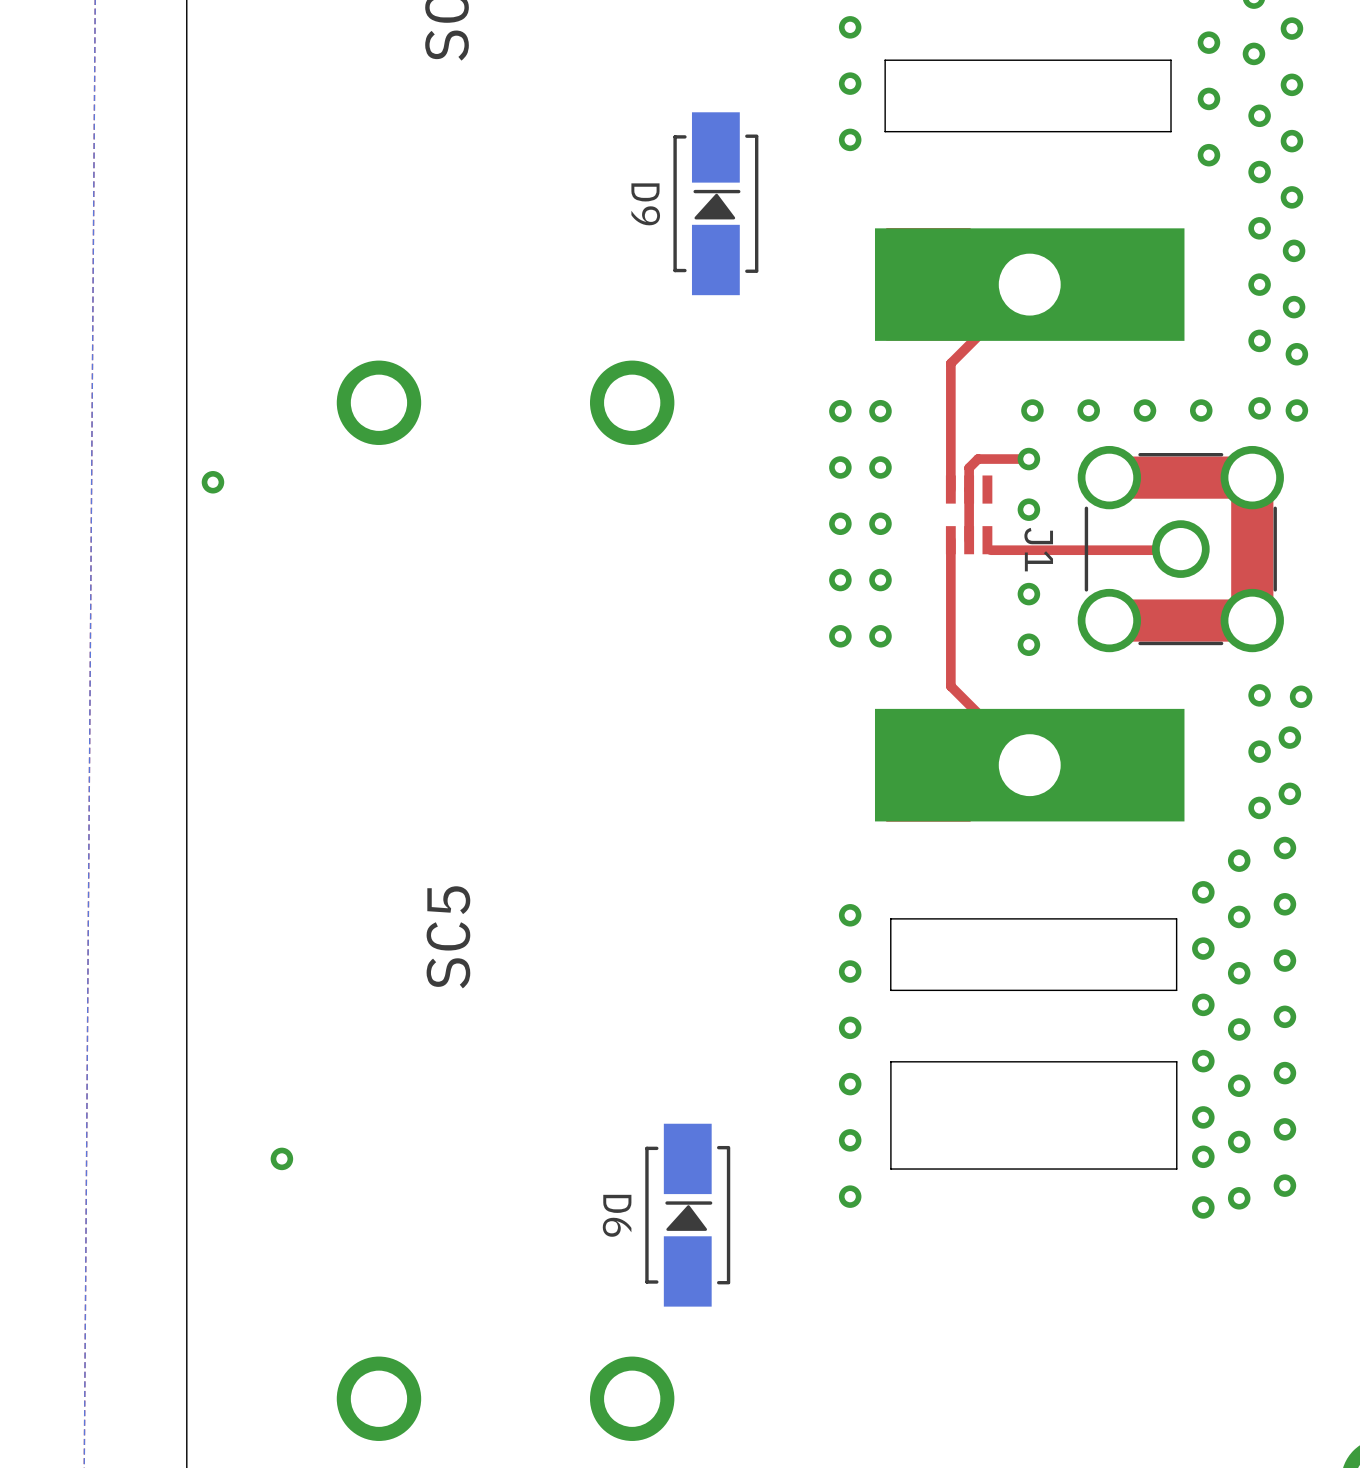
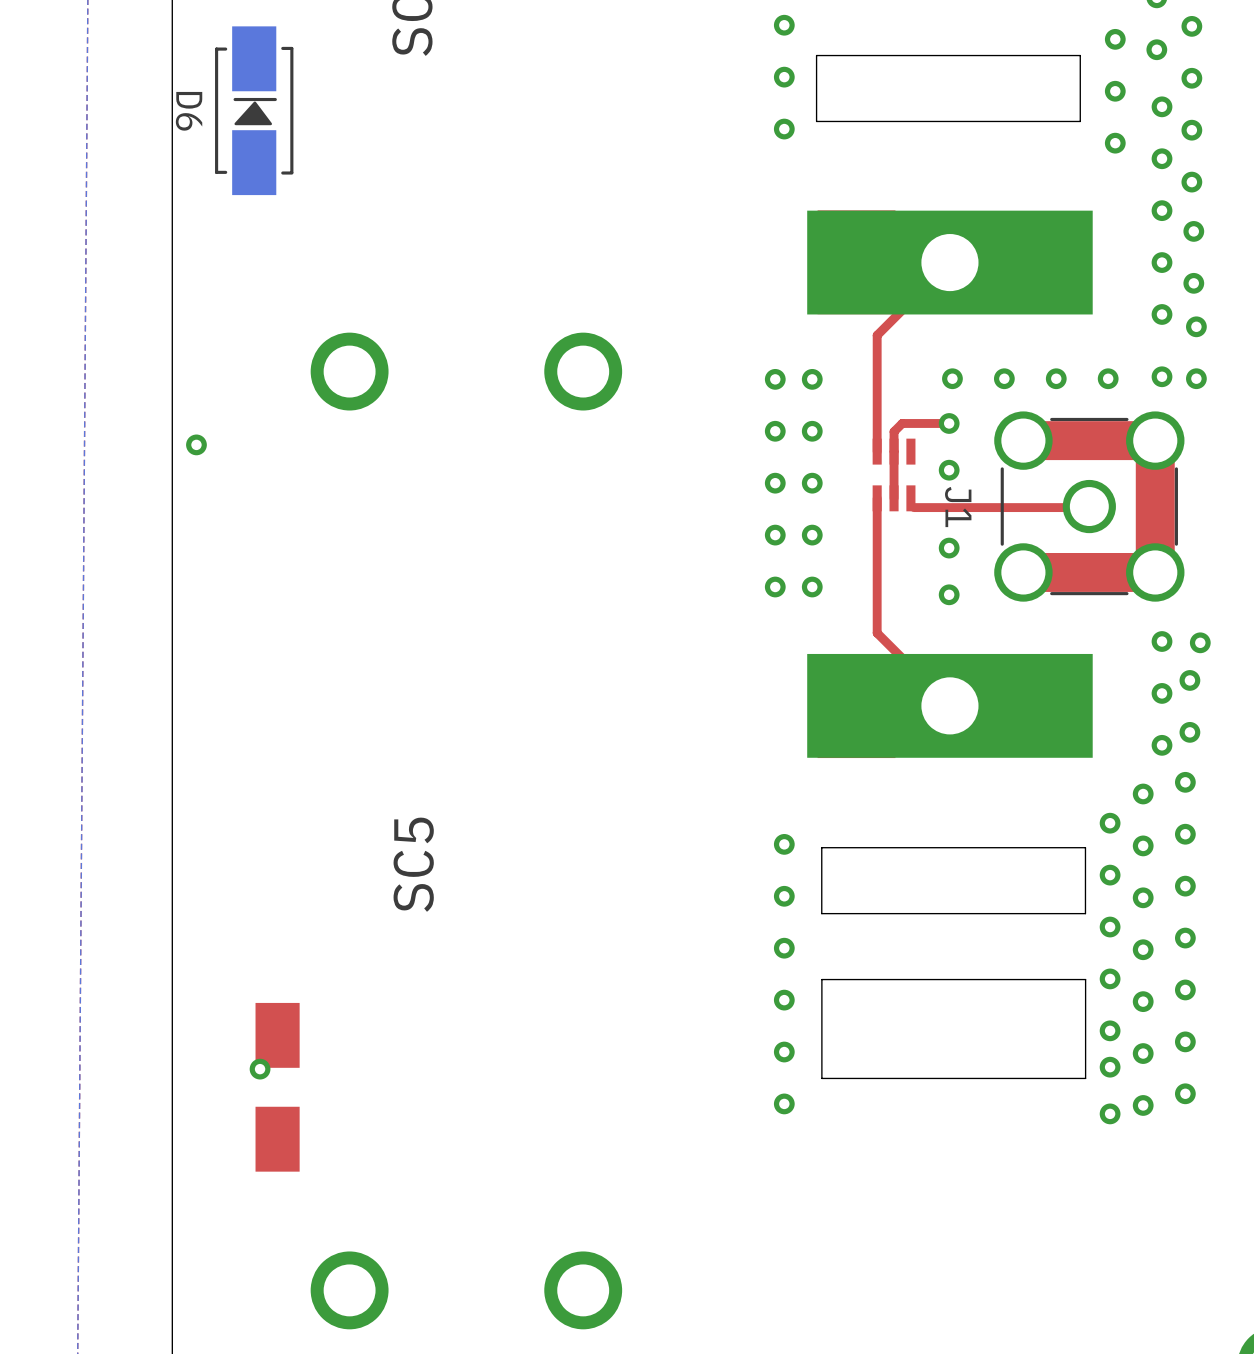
D9: (715, 203) -> none
part: none -> (277, 1087)
D6 position: (687, 1215) -> (254, 110)

